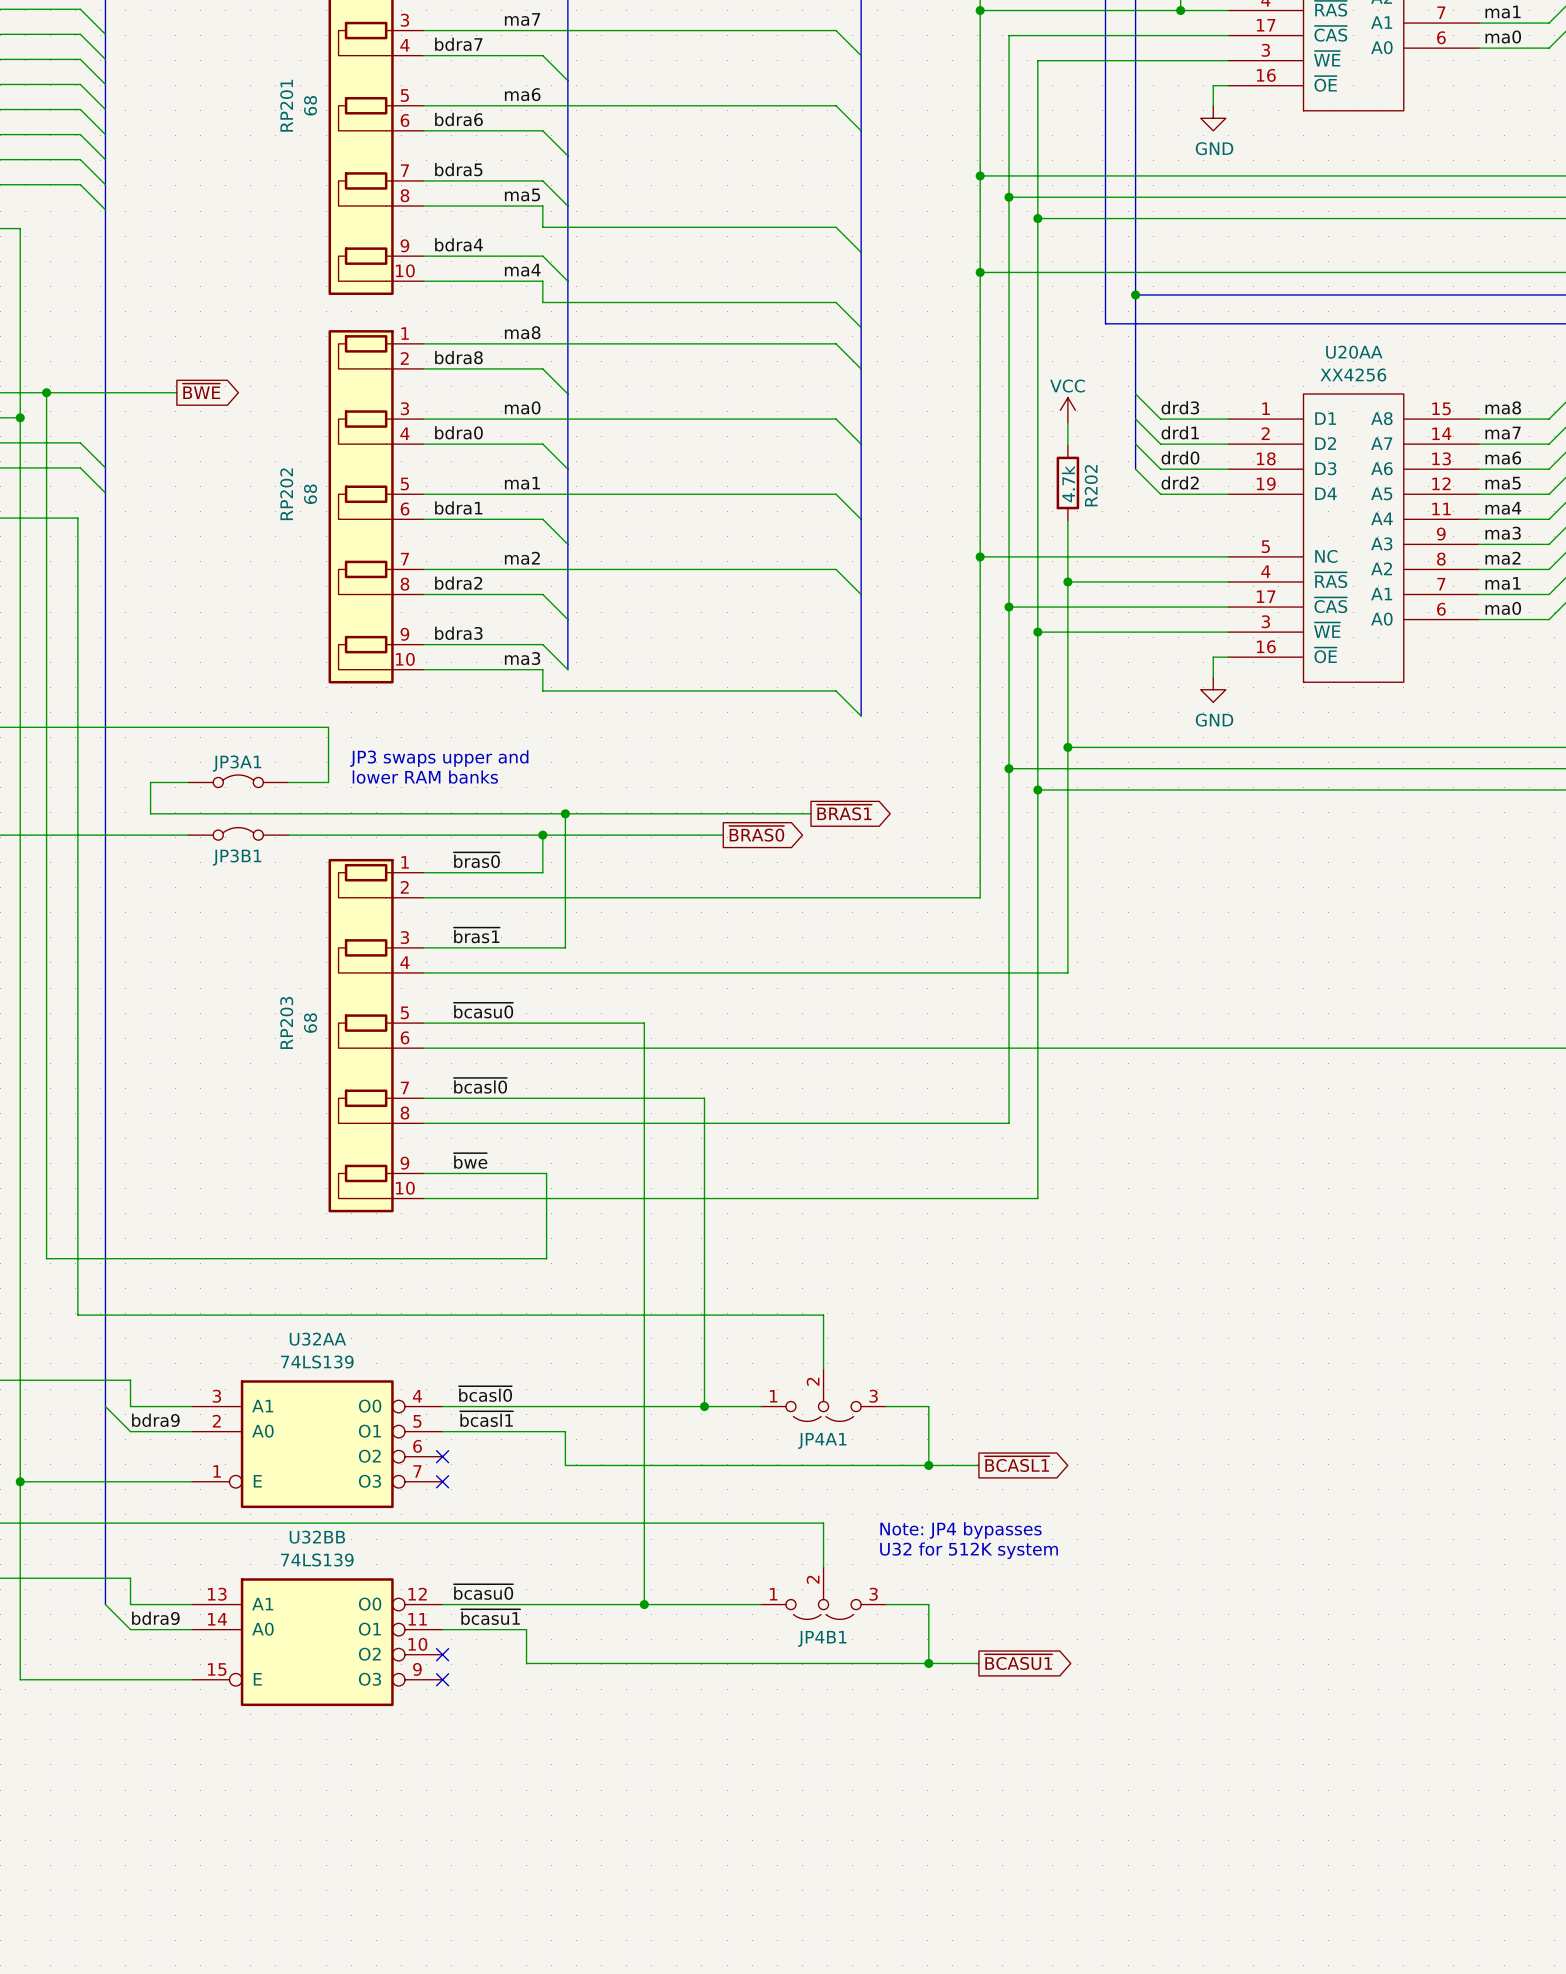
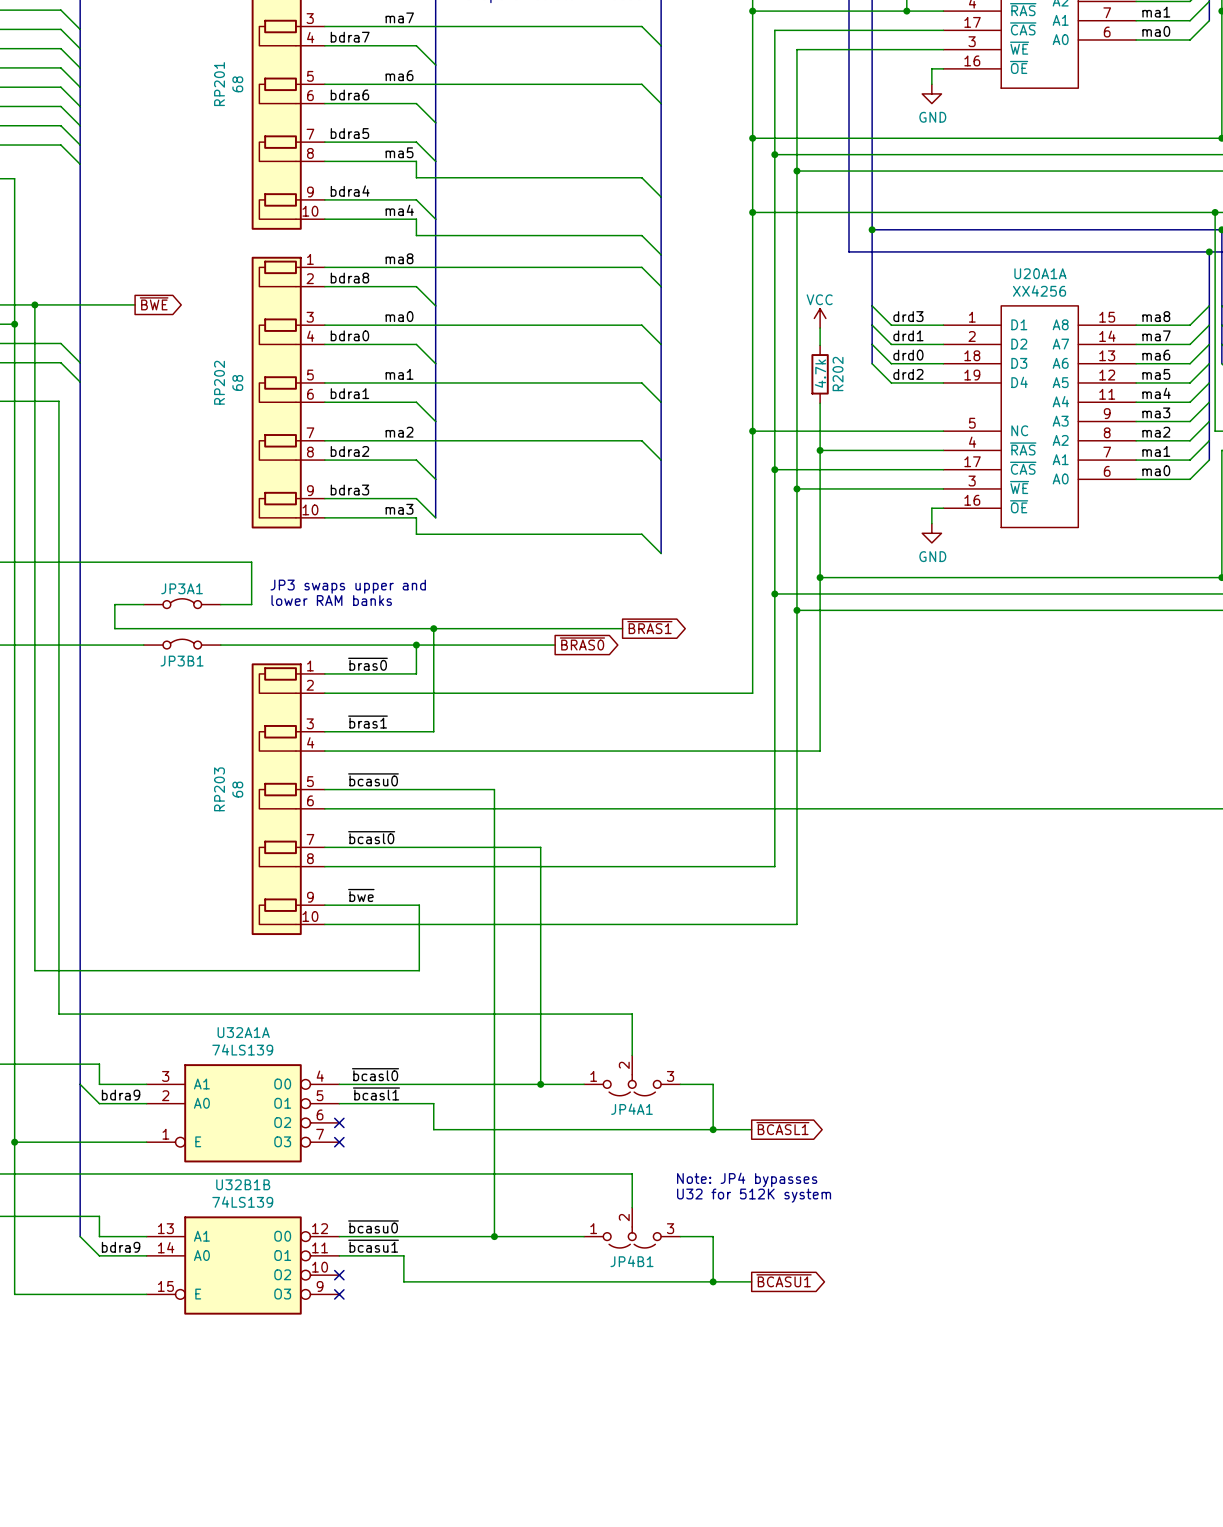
U20AA name: U20AA (1354, 352) -> U20A1A (1040, 273)
U32AA name: U32AA (317, 1339) -> U32A1A (243, 1032)
U32BB name: U32BB (317, 1537) -> U32B1B (243, 1184)

